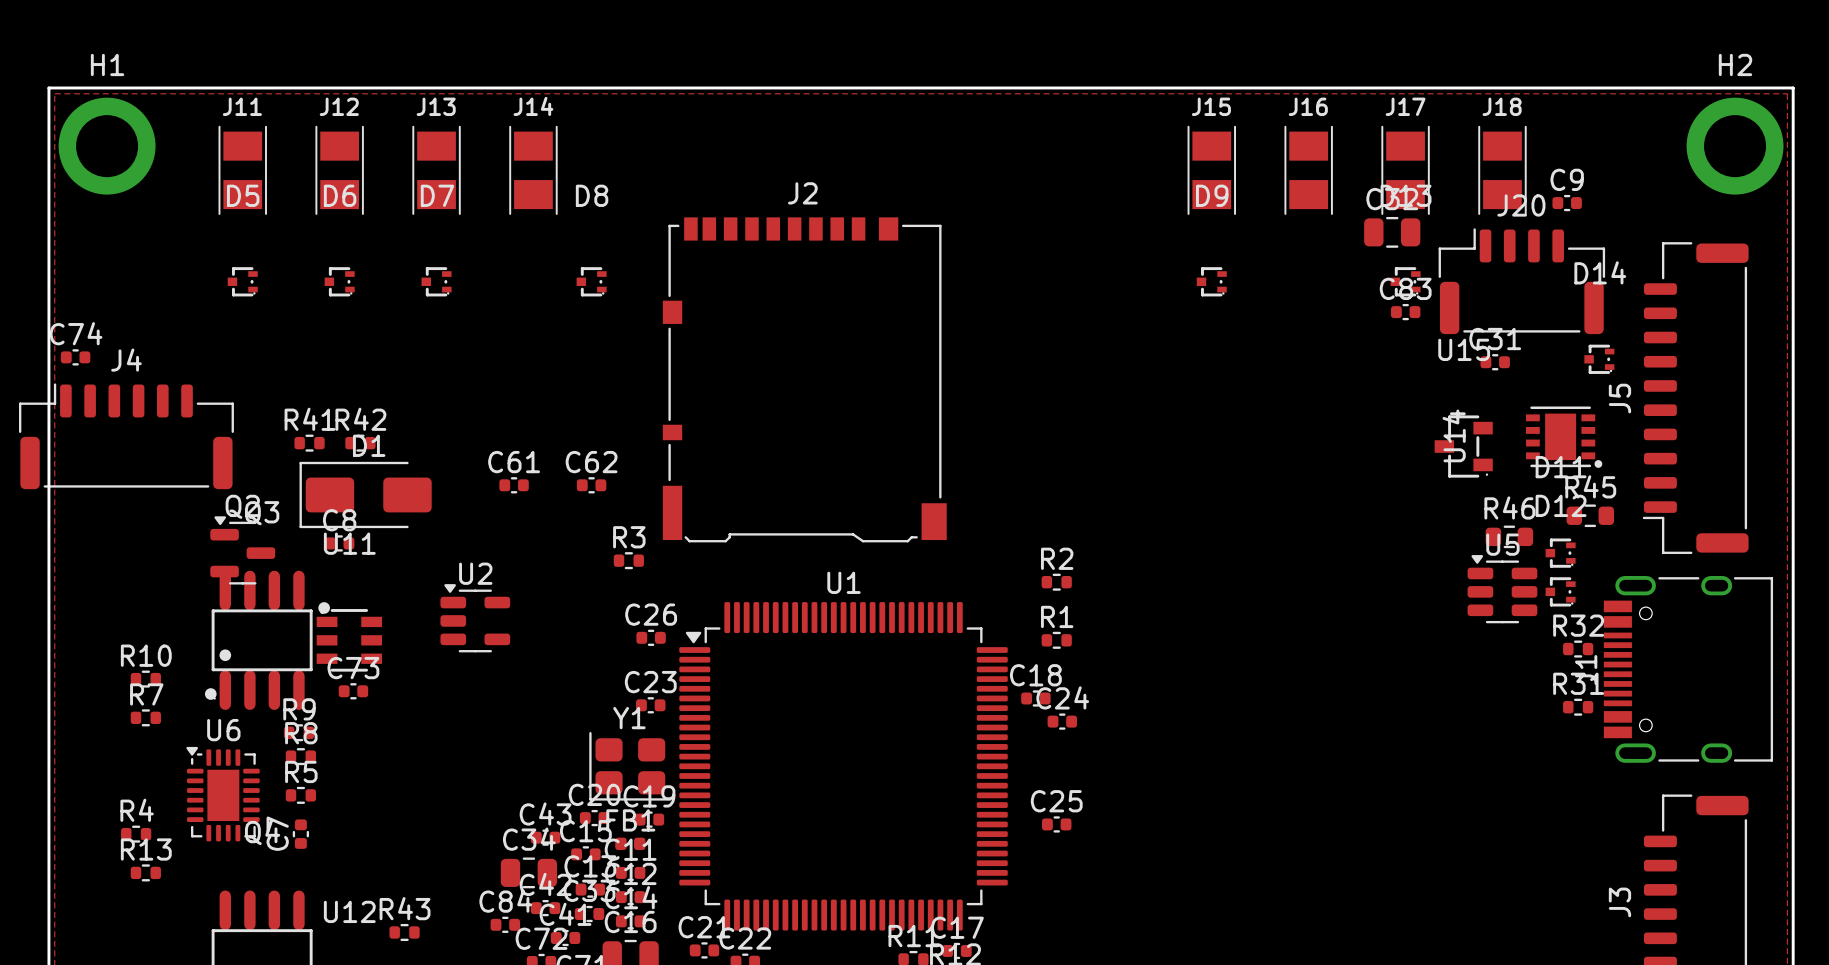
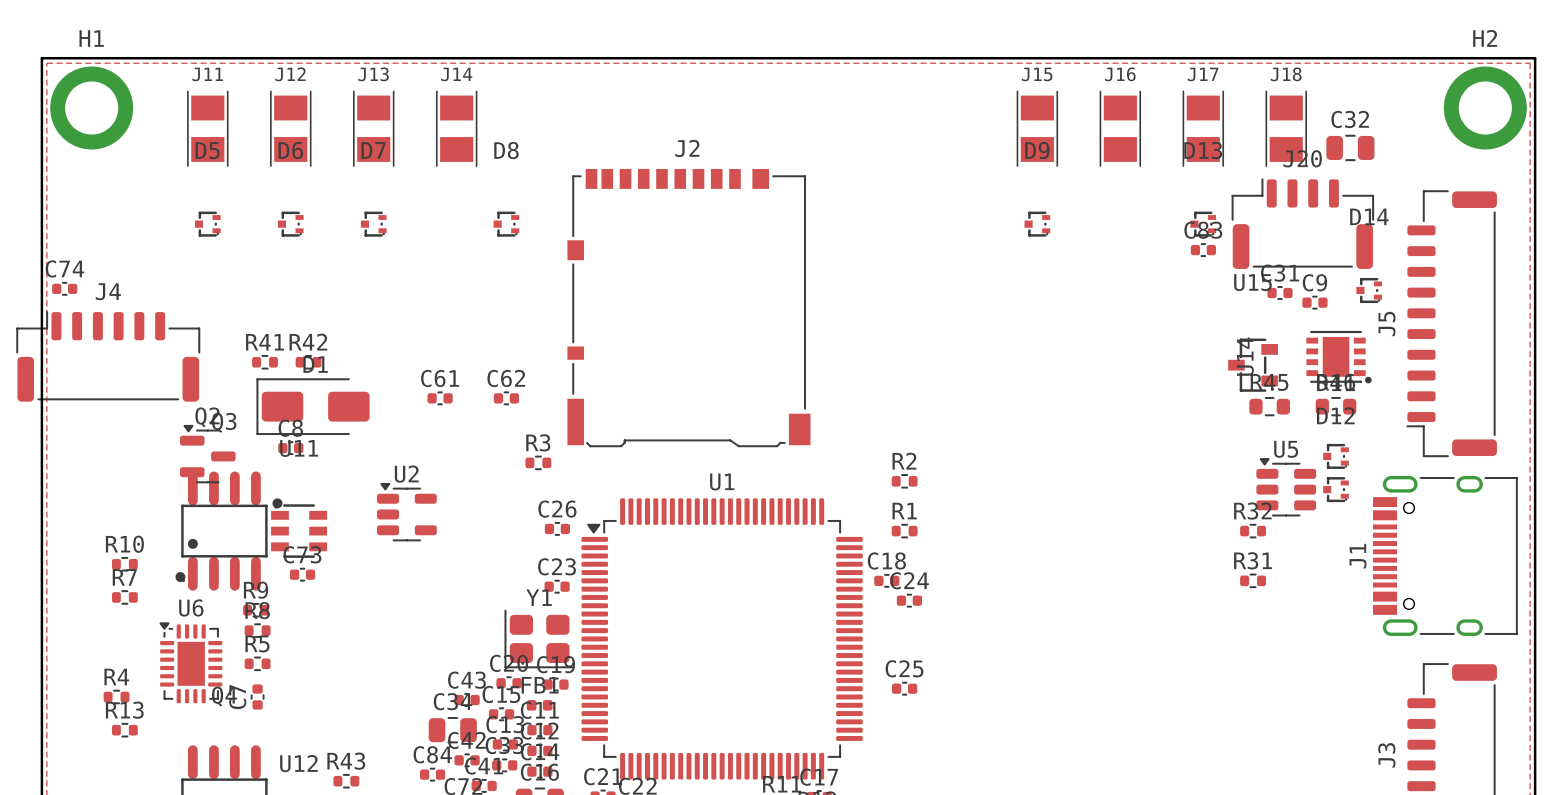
C9 position: (1567, 203) -> (1314, 302)
C32 position: (1392, 232) -> (1350, 147)
R45 position: (1590, 515) -> (1269, 406)
R46 position: (1509, 536) -> (1336, 406)
R32 position: (1578, 649) -> (1253, 531)
R31 position: (1578, 707) -> (1253, 580)

